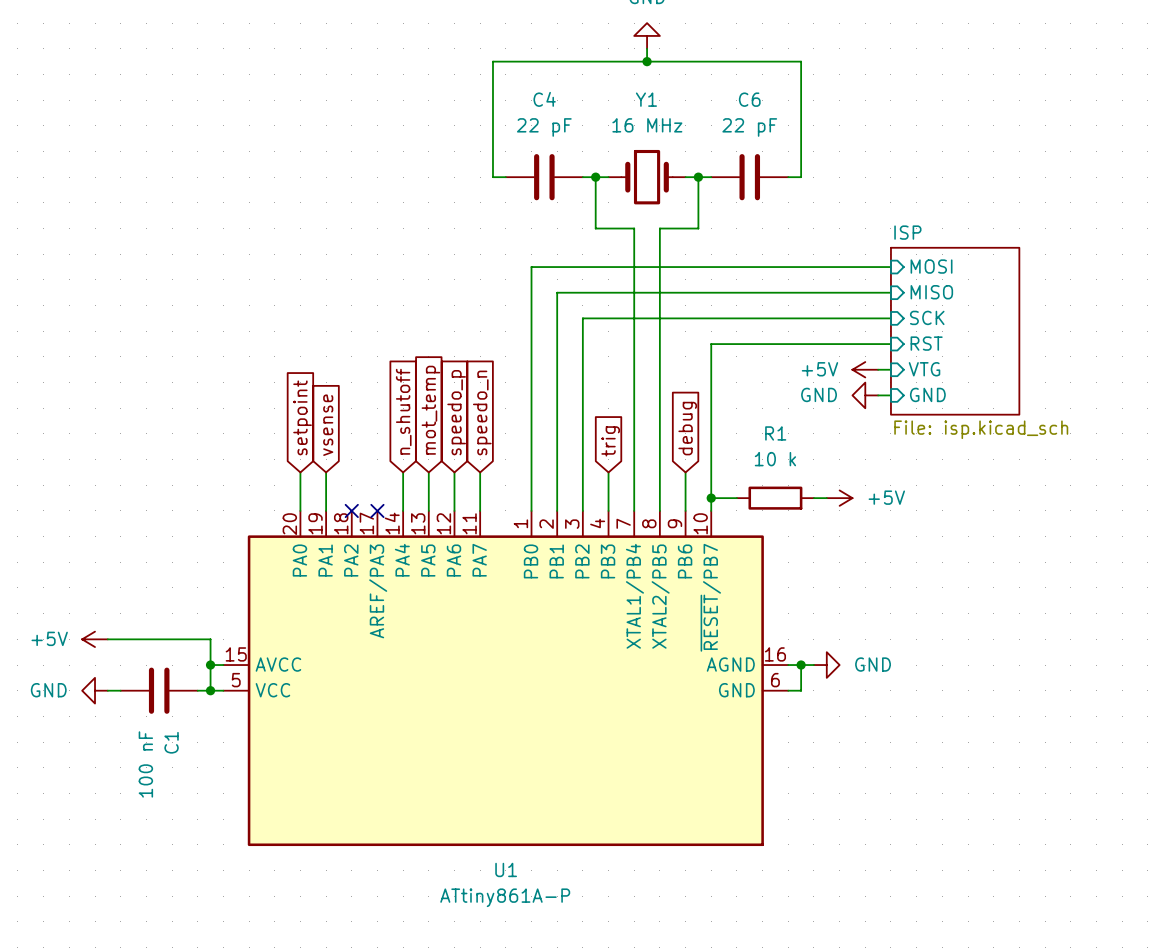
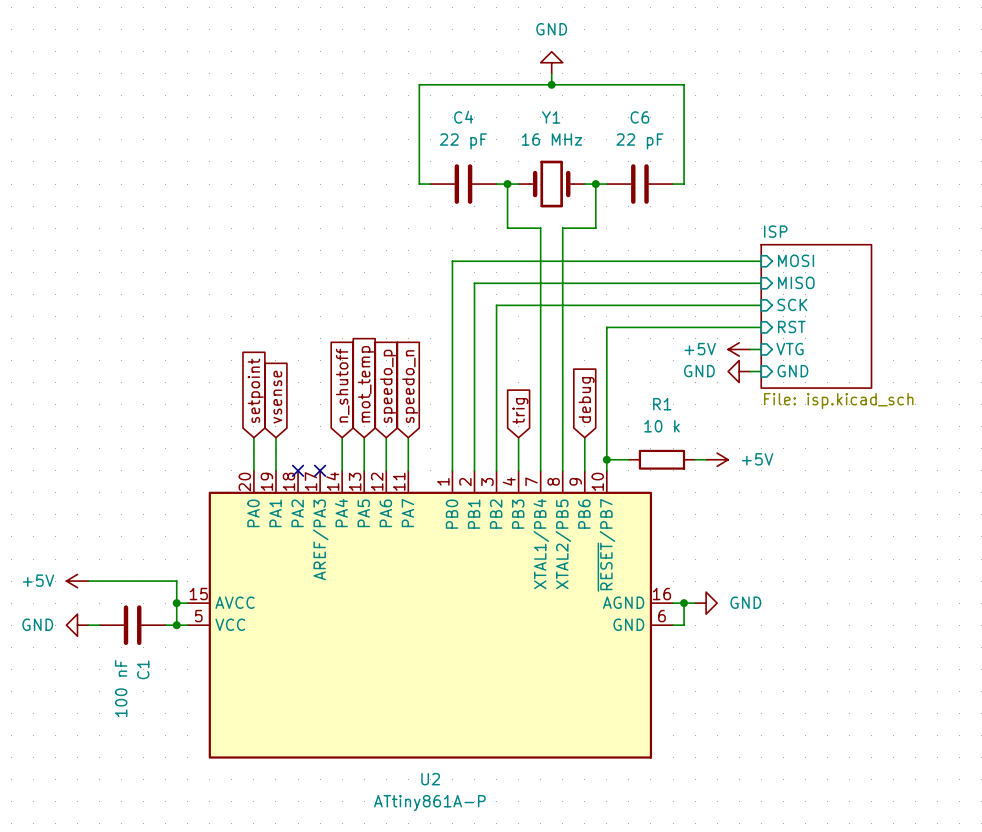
U1 name: U1 (506, 869) -> U2 (430, 779)

